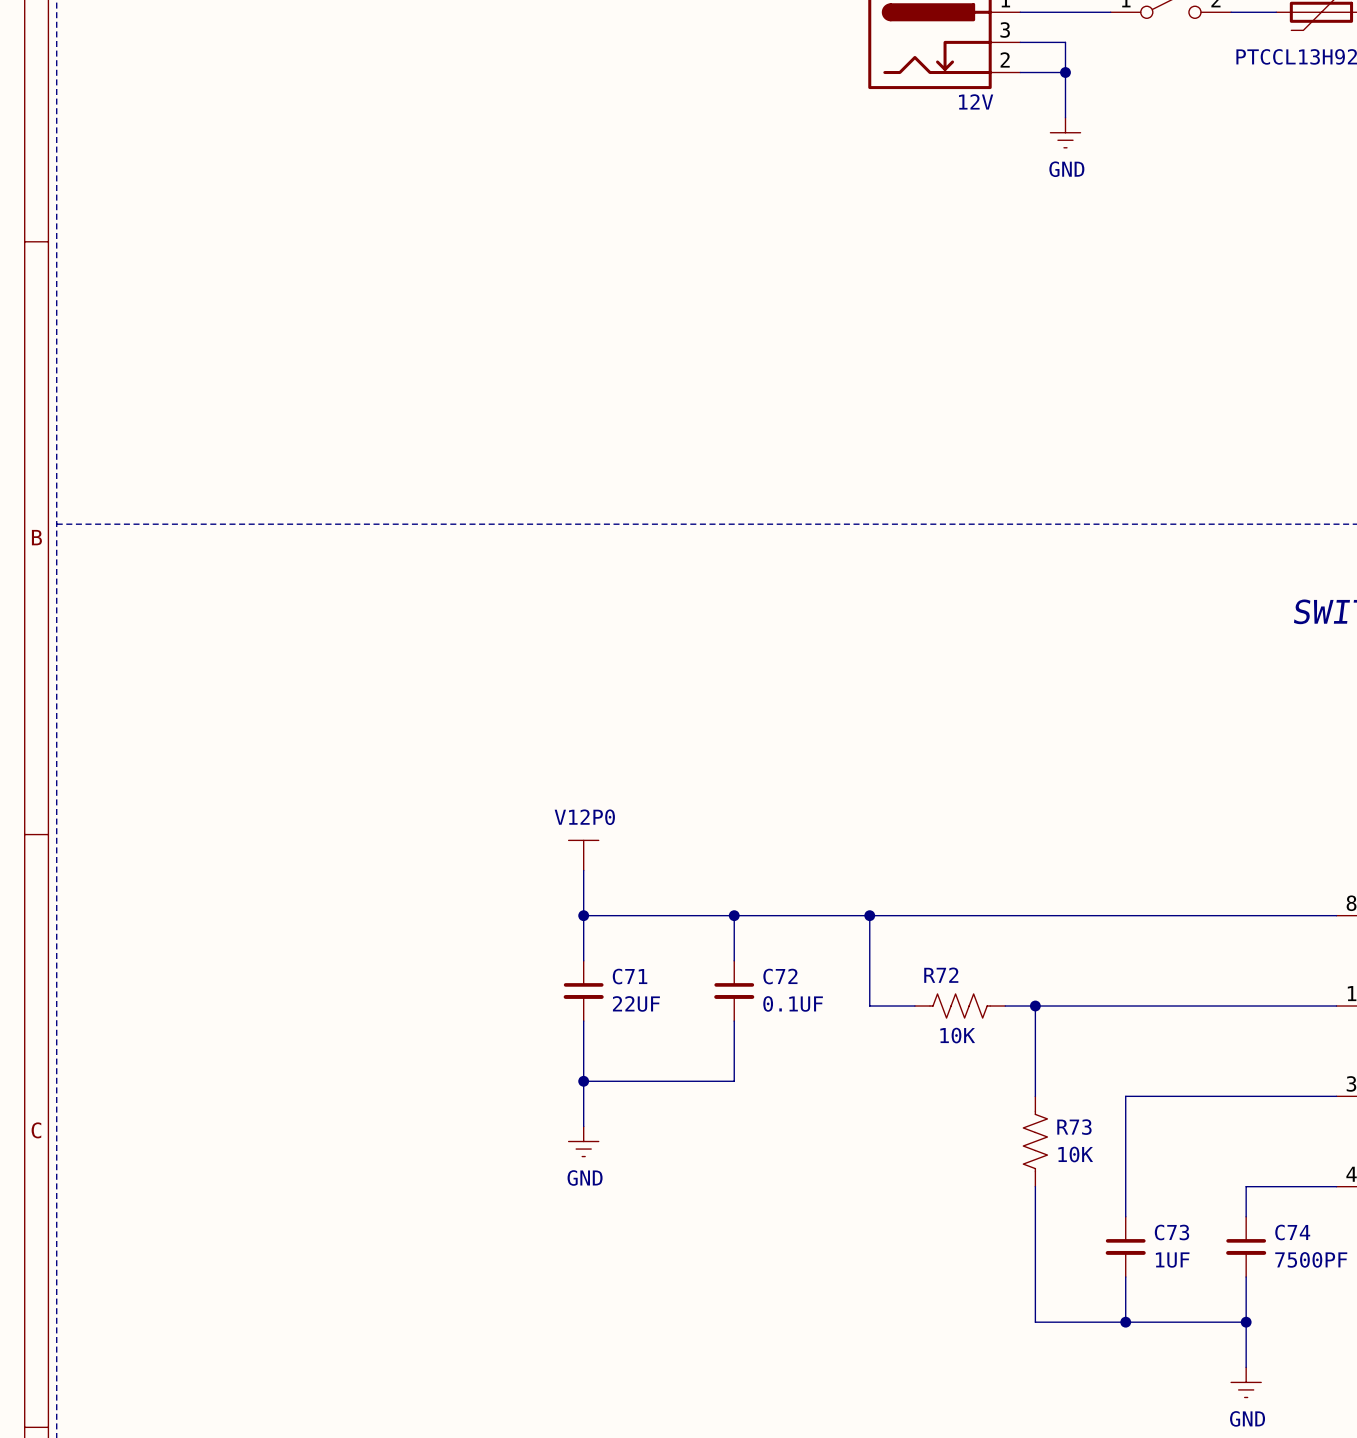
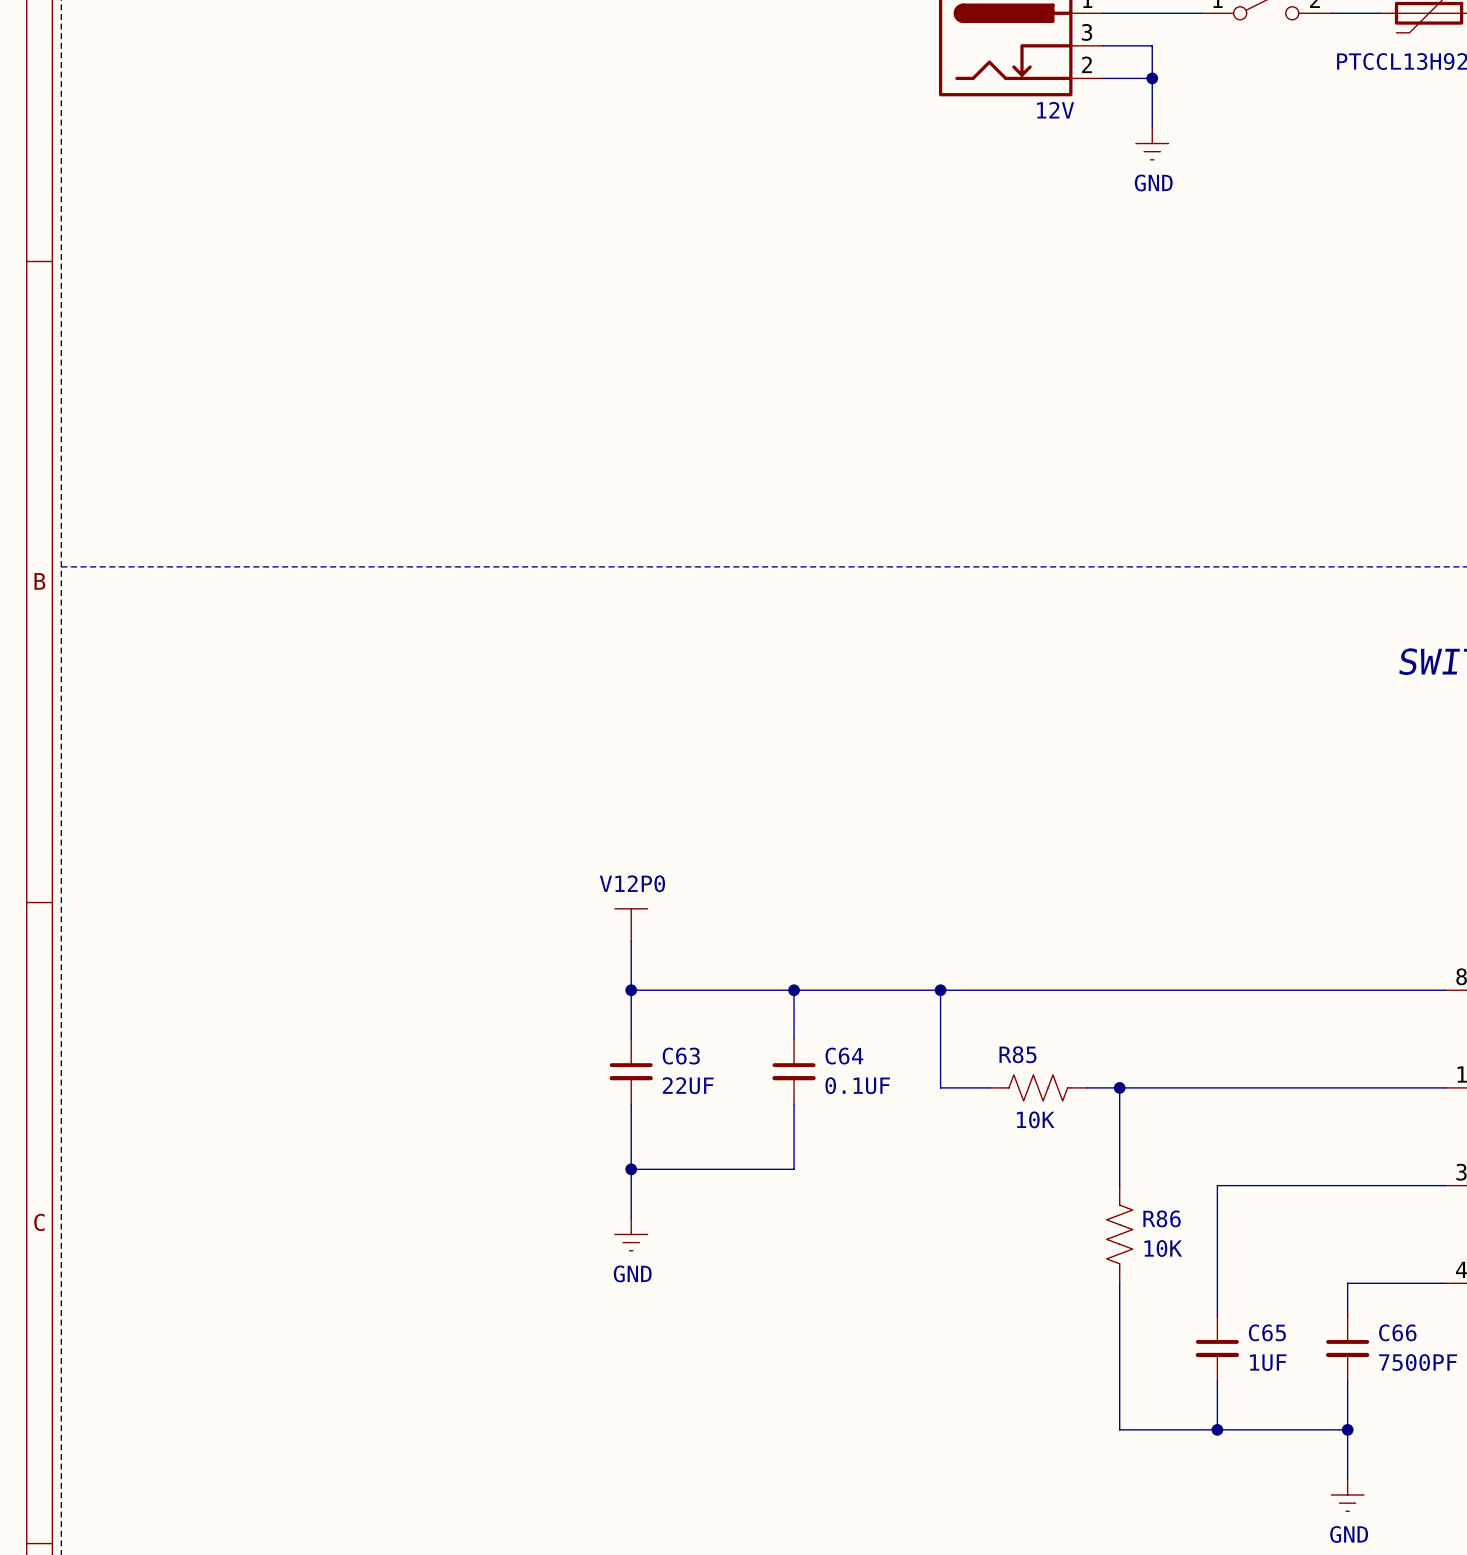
R72 name: R72 (941, 975) -> R85 (1017, 1054)
C71 name: C71 (630, 976) -> C63 (681, 1056)
C72 name: C72 (780, 976) -> C64 (844, 1056)
R73 name: R73 (1074, 1127) -> R86 (1162, 1218)
C73 name: C73 (1171, 1232) -> C65 (1267, 1332)
C74 name: C74 (1292, 1232) -> C66 (1397, 1332)

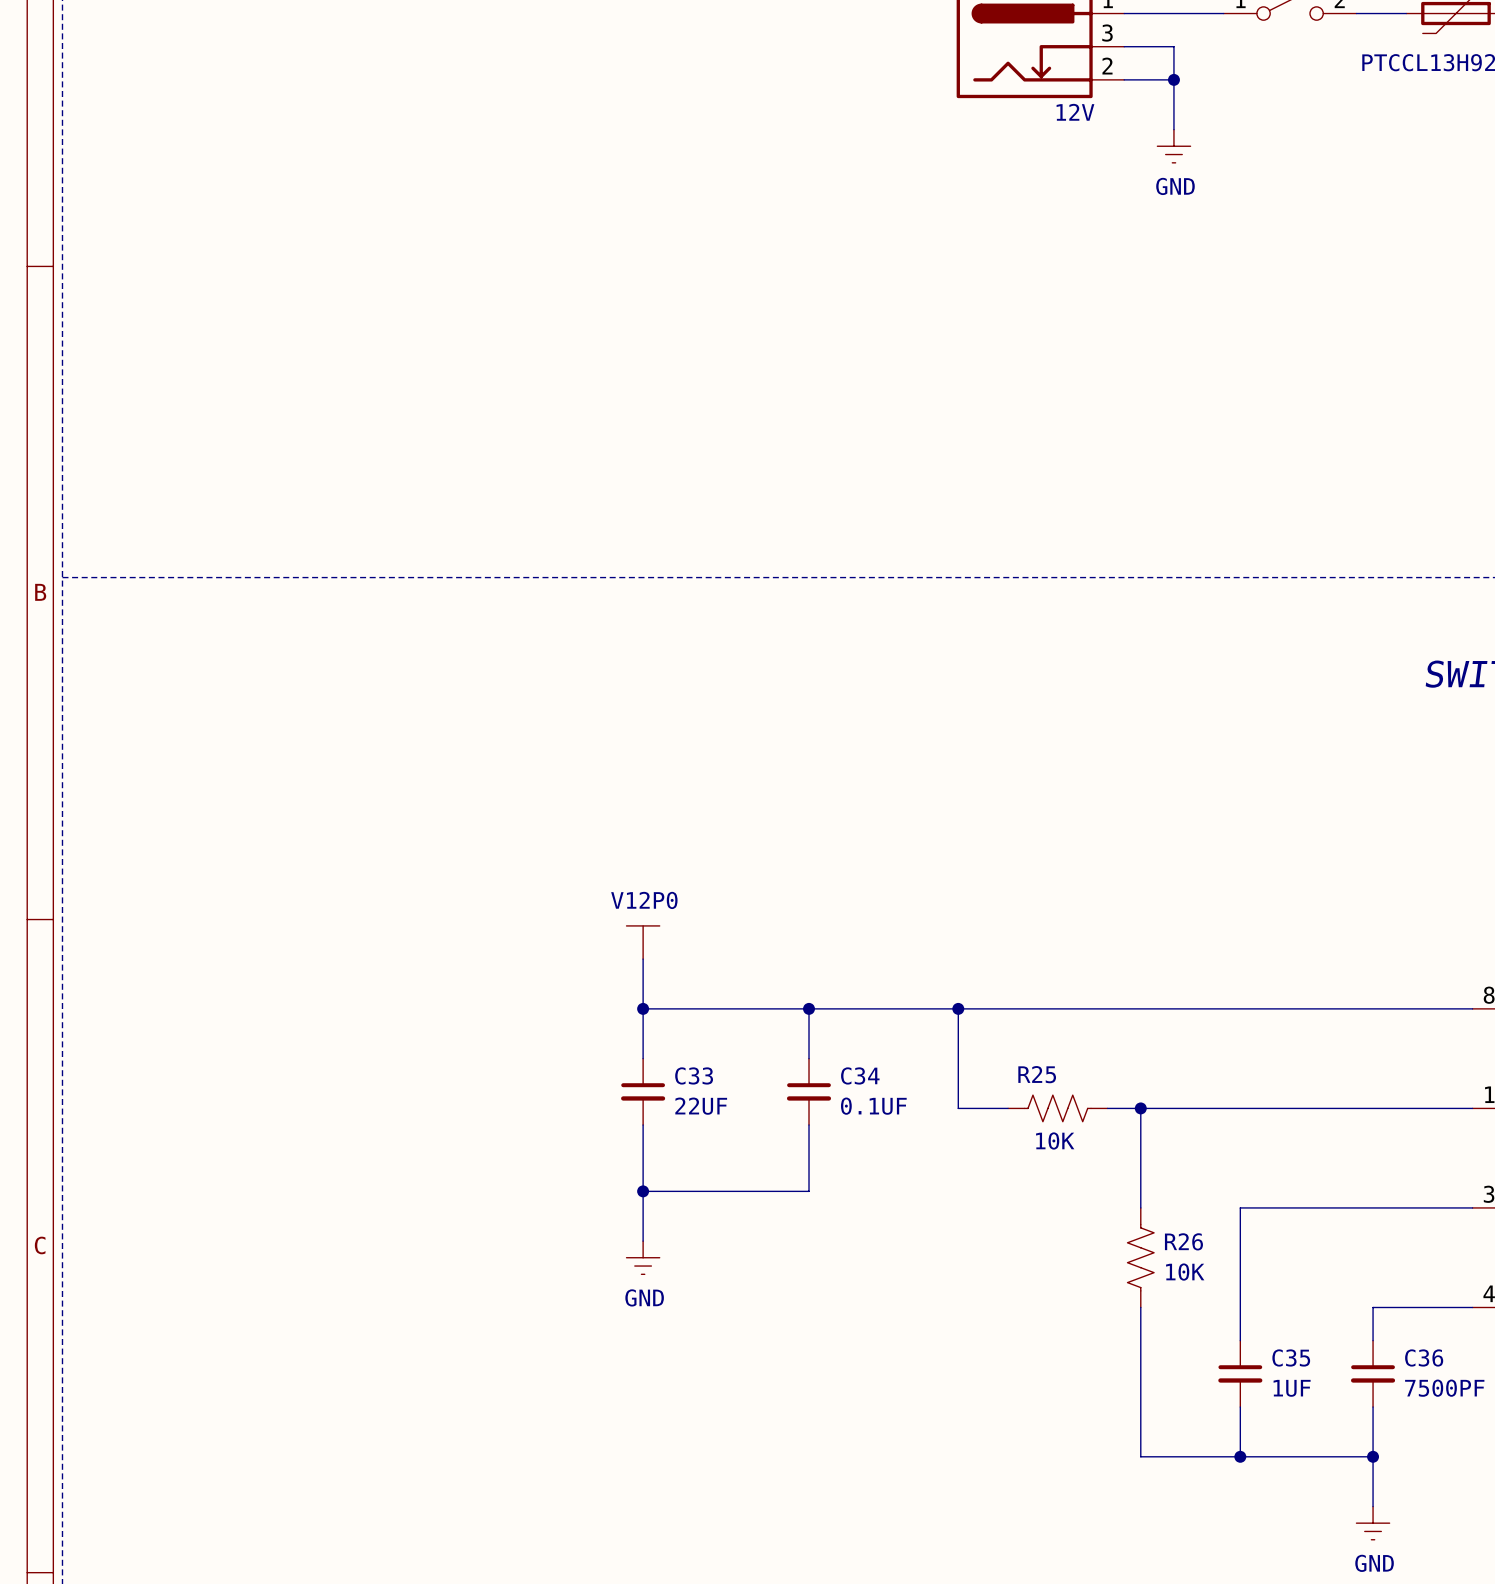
R85 name: R85 (1017, 1054) -> R25 (1037, 1074)
C63 name: C63 (681, 1056) -> C33 (694, 1075)
C64 name: C64 (844, 1056) -> C34 (860, 1075)
R86 name: R86 (1162, 1218) -> R26 (1183, 1241)
C65 name: C65 (1267, 1332) -> C35 (1291, 1357)
C66 name: C66 (1397, 1332) -> C36 (1424, 1357)

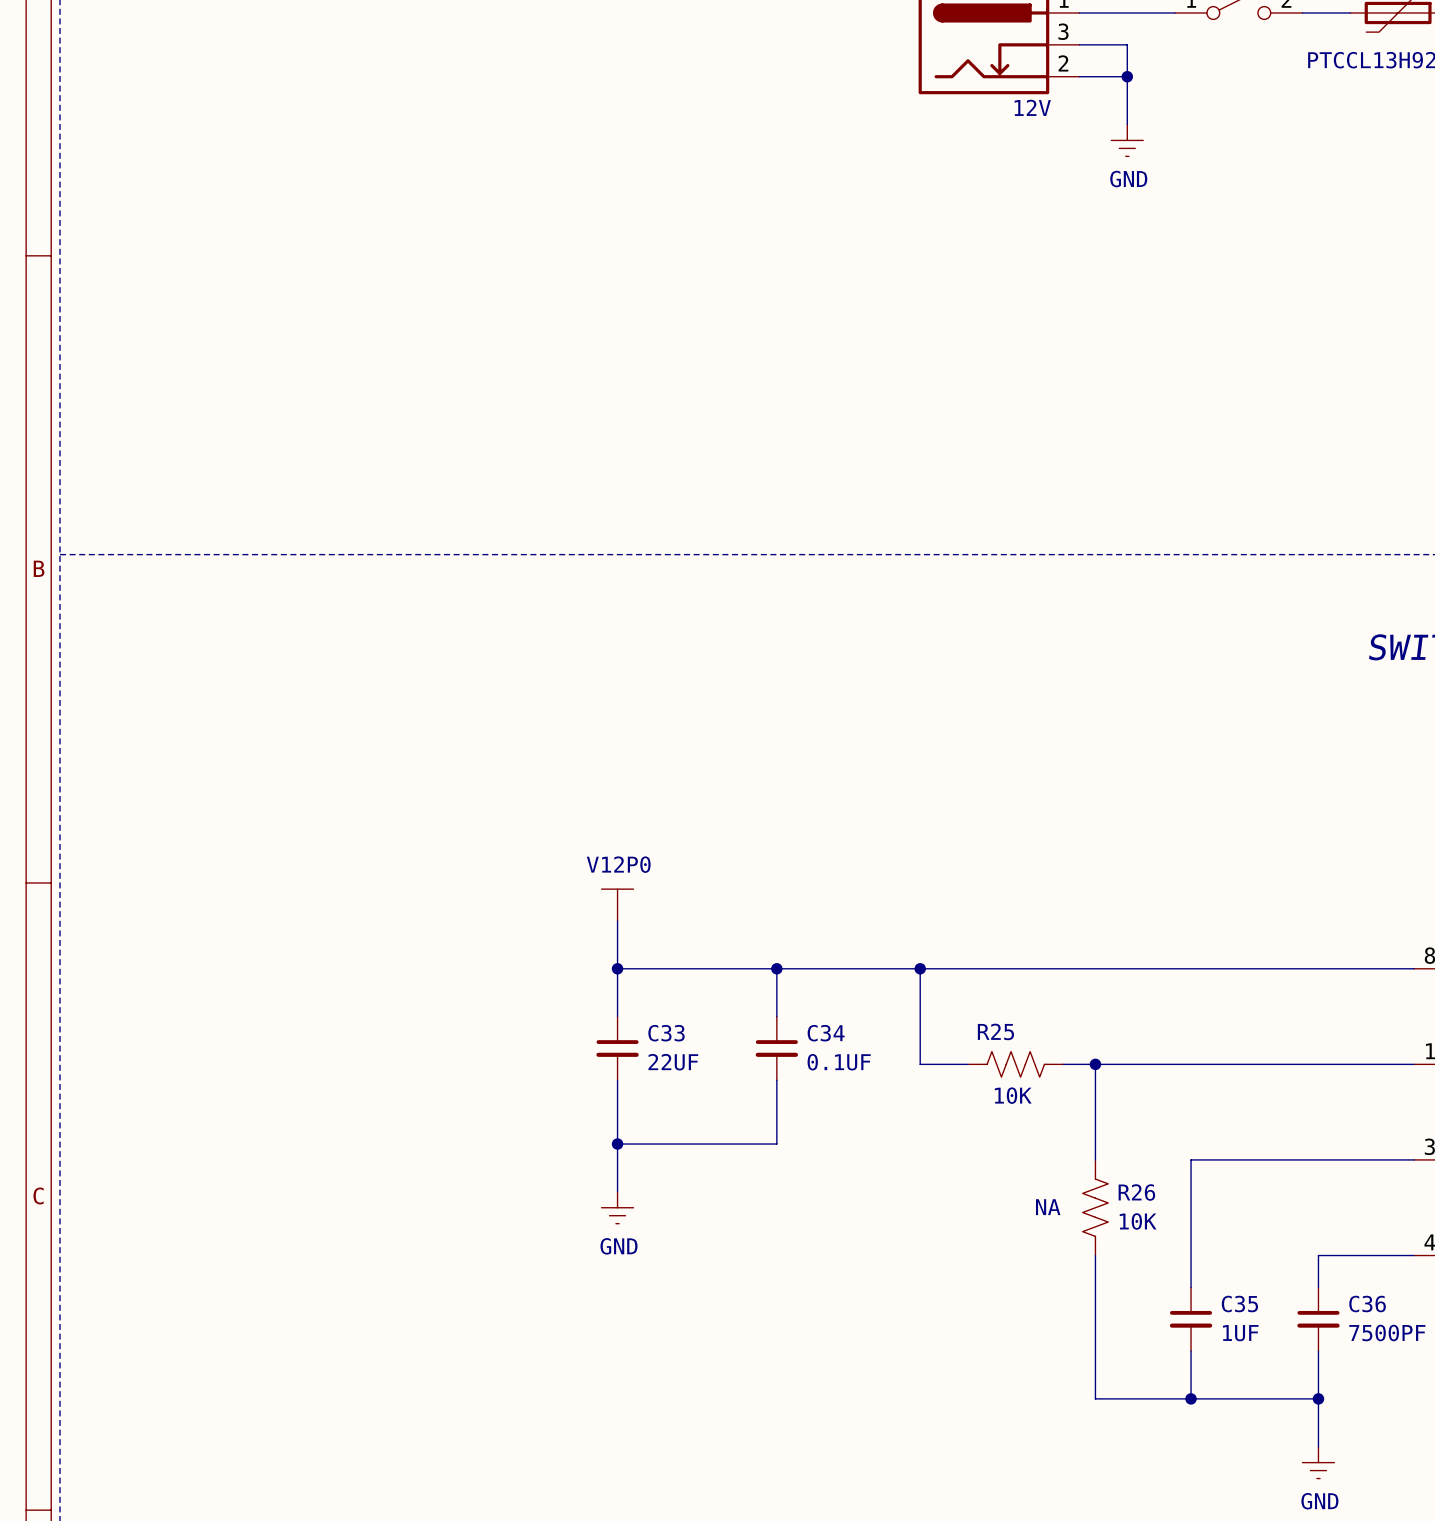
R26 text: none -> NA (1048, 1207)

